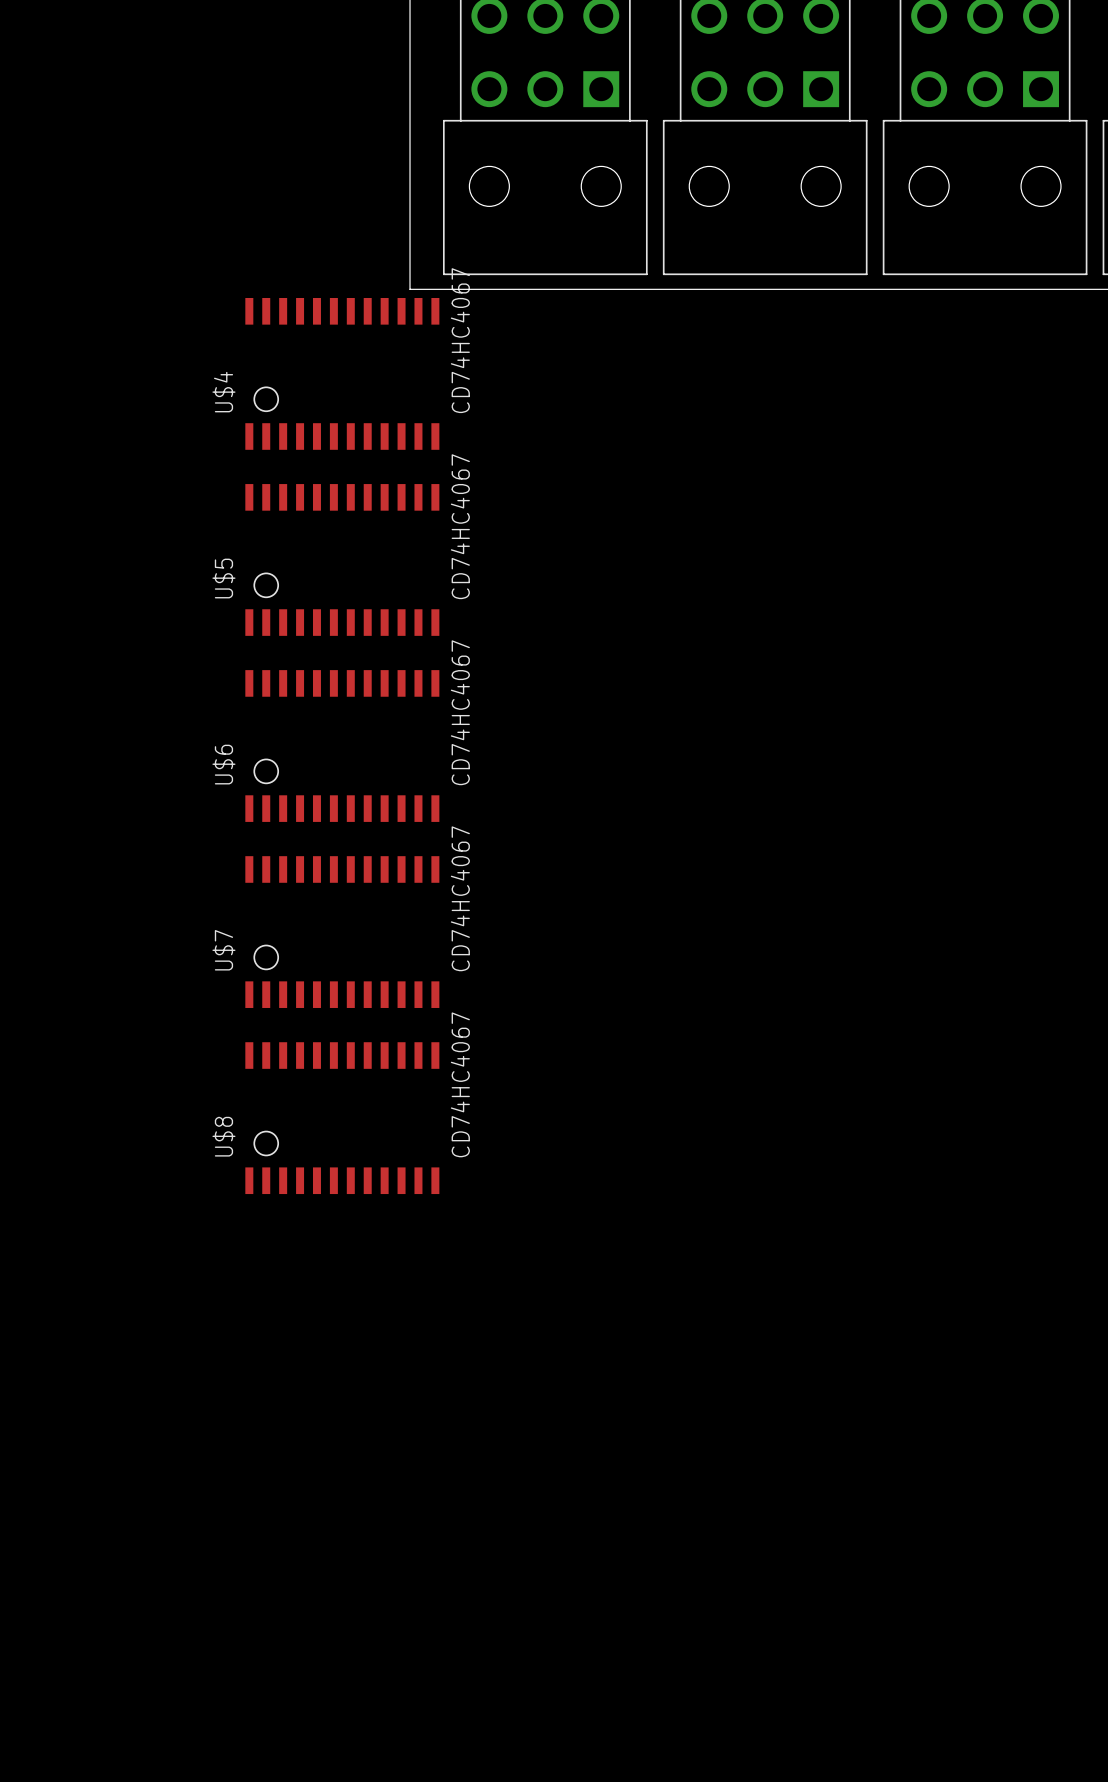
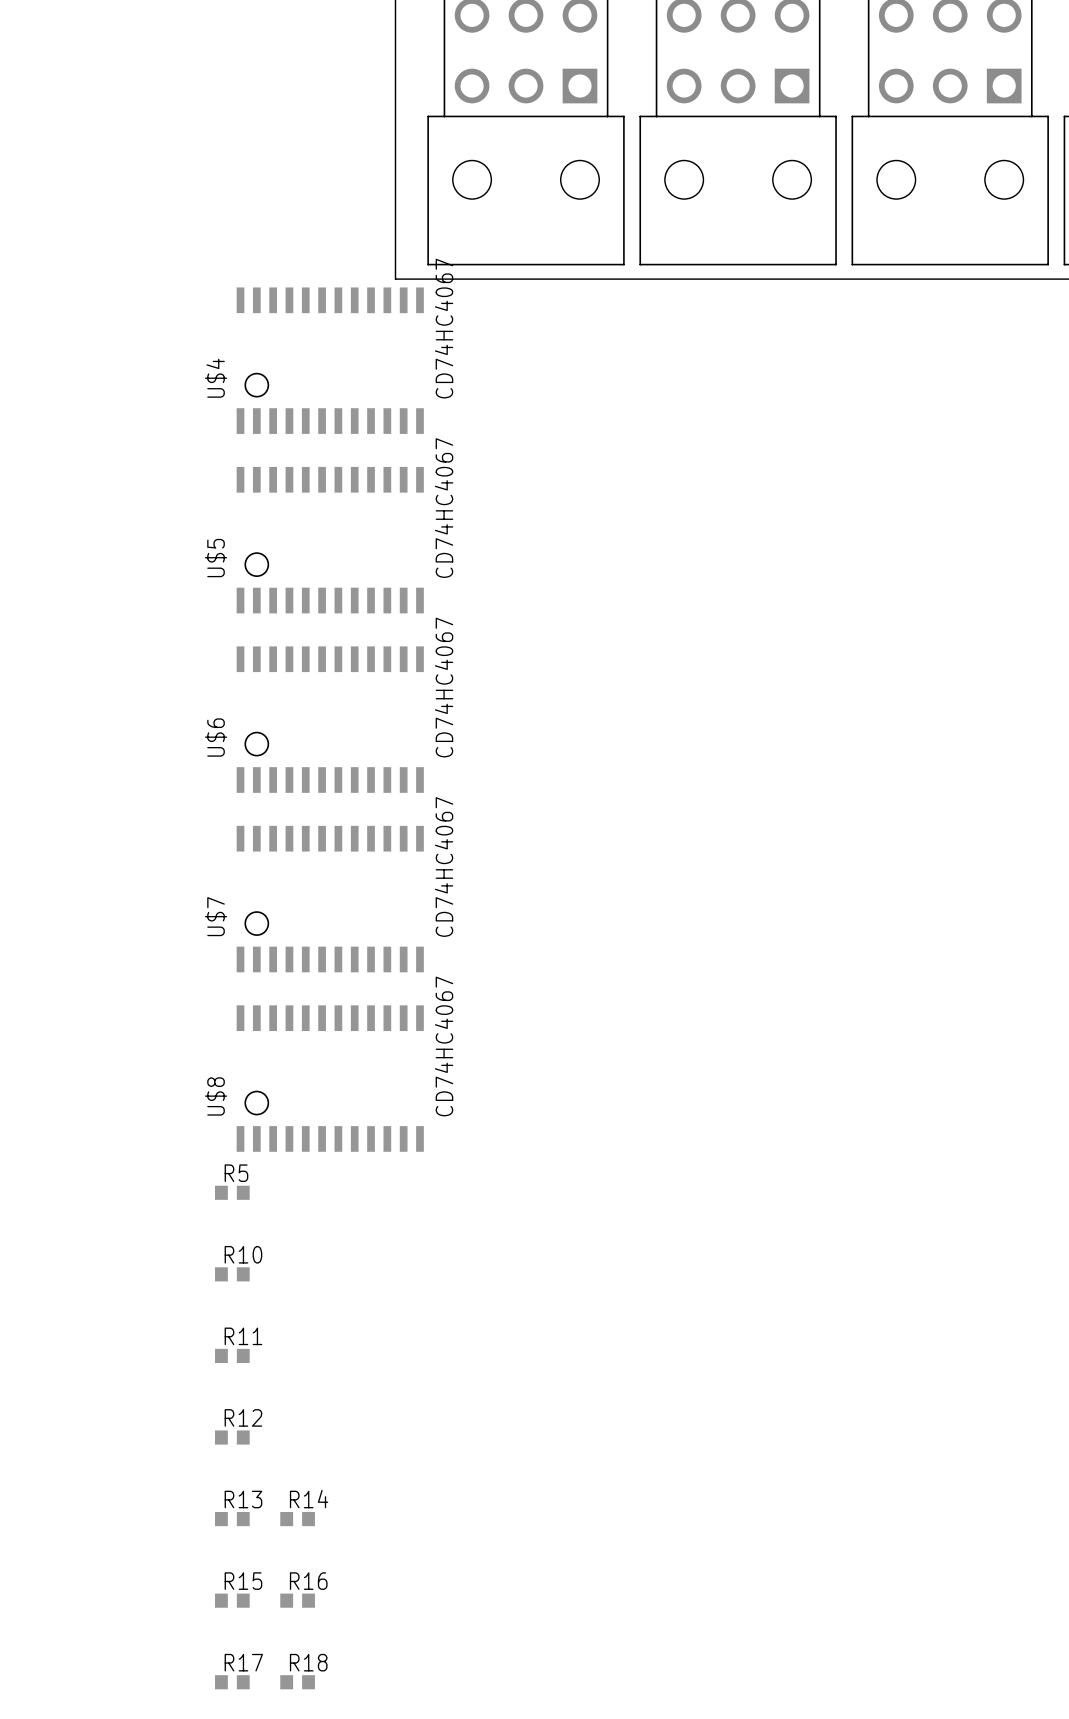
R5: none -> (232, 1192)
R10: none -> (232, 1274)
R11: none -> (232, 1355)
R12: none -> (232, 1437)
R13: none -> (232, 1519)
R14: none -> (297, 1519)
R15: none -> (232, 1600)
R16: none -> (297, 1600)
R17: none -> (232, 1682)
R18: none -> (297, 1682)

